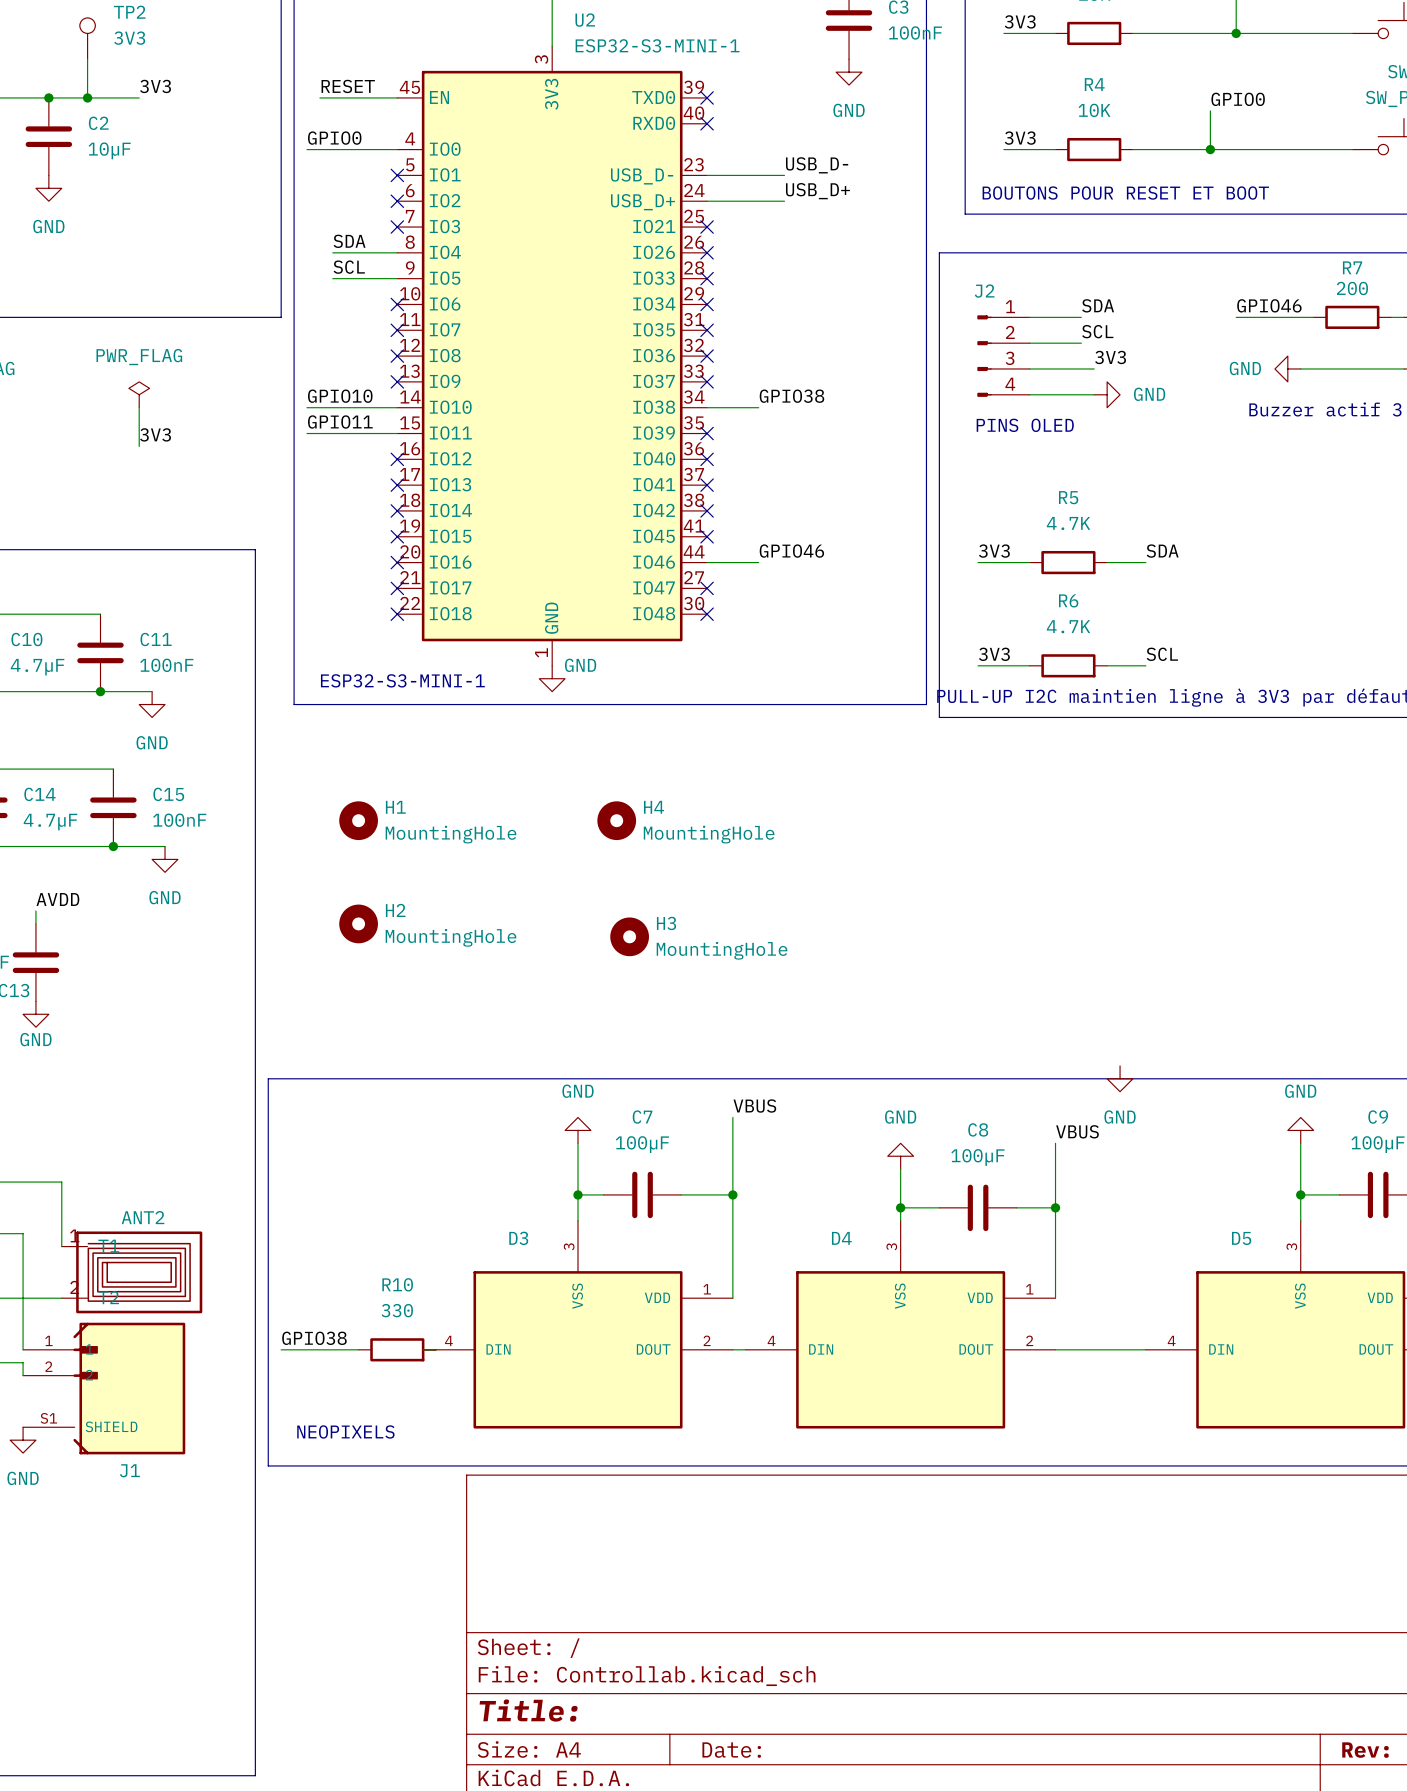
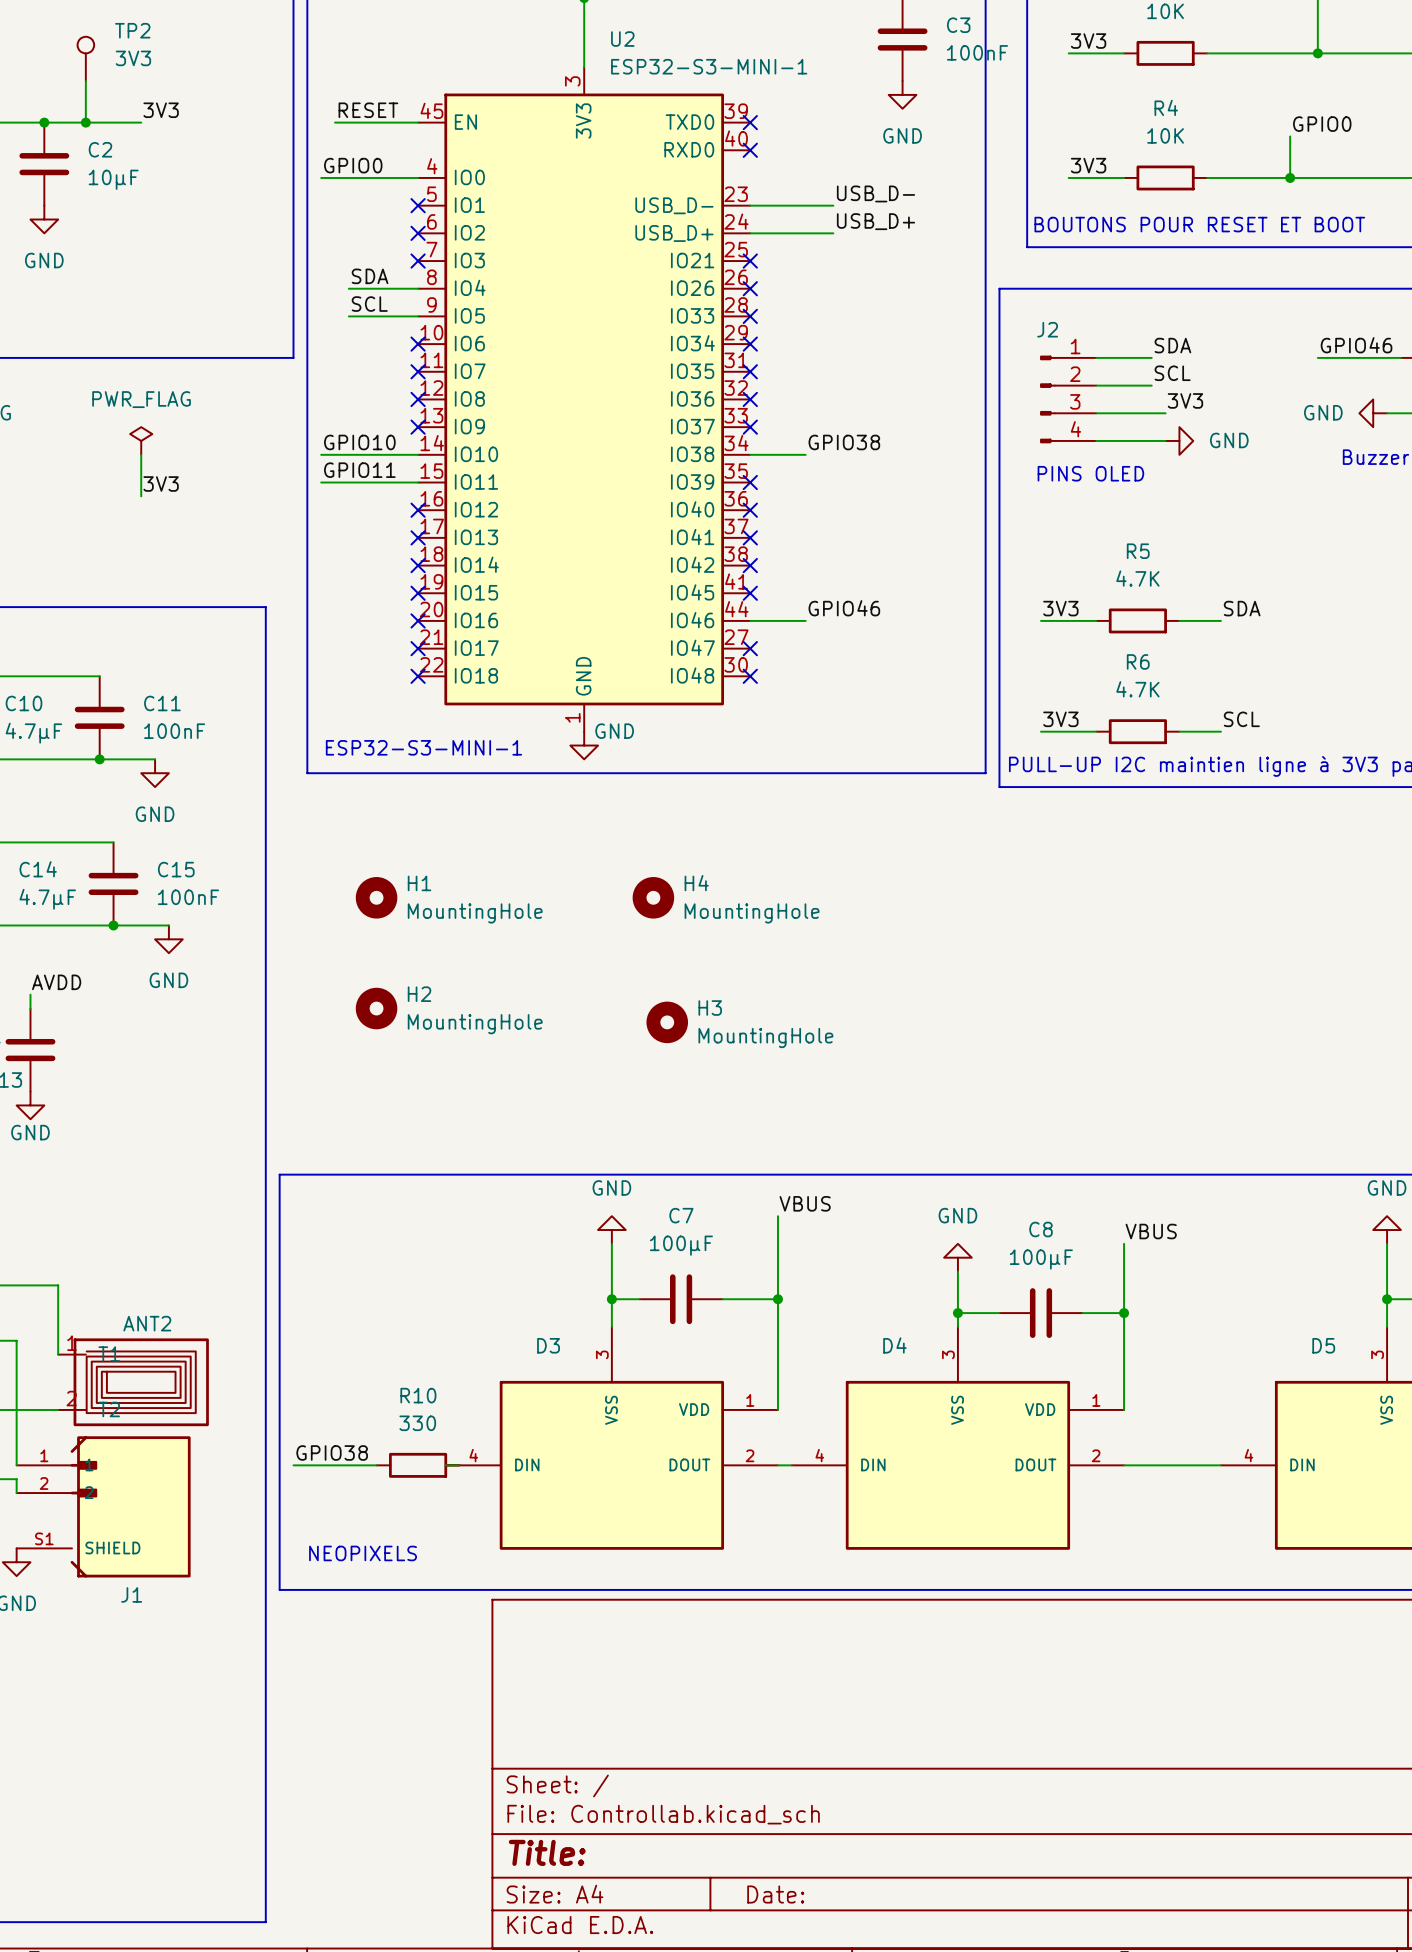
power symbol: GND (1120, 1078) -> none

